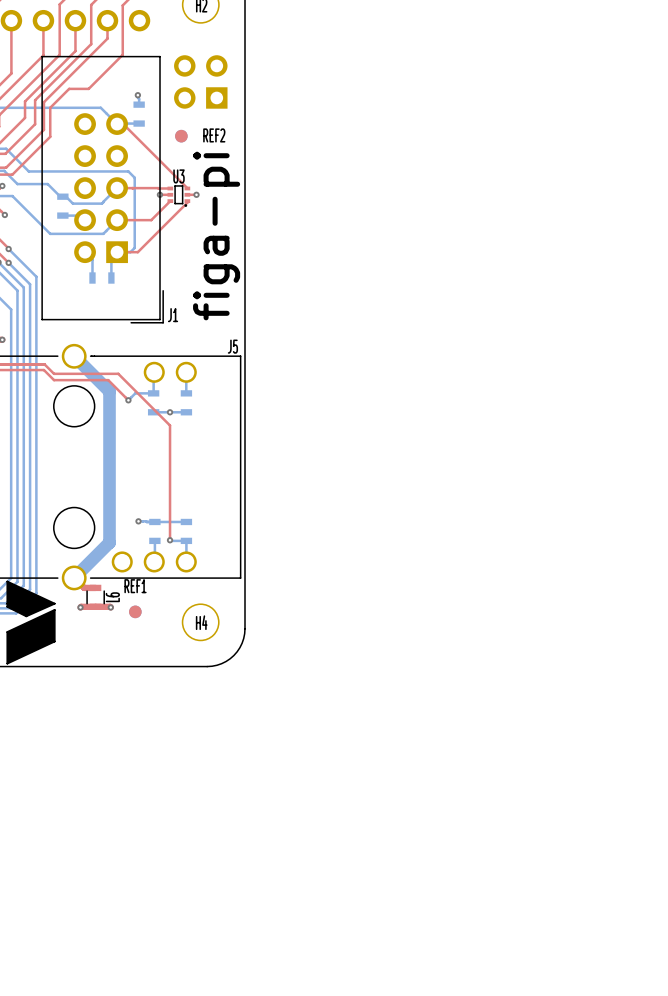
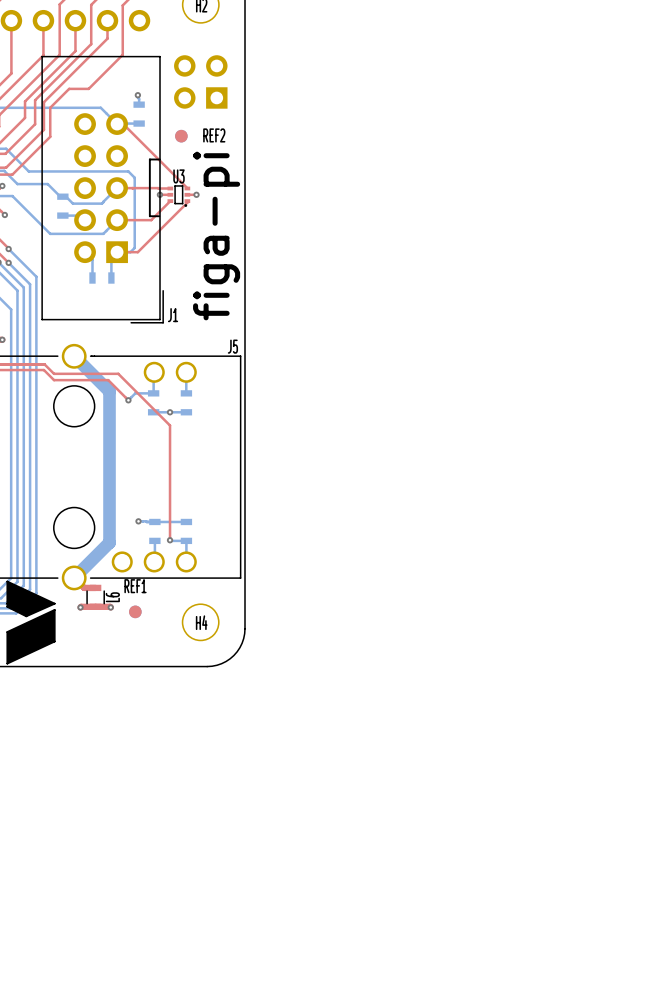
J1 footprint: [41, 55, 164, 324] -> [41, 55, 164, 324]

